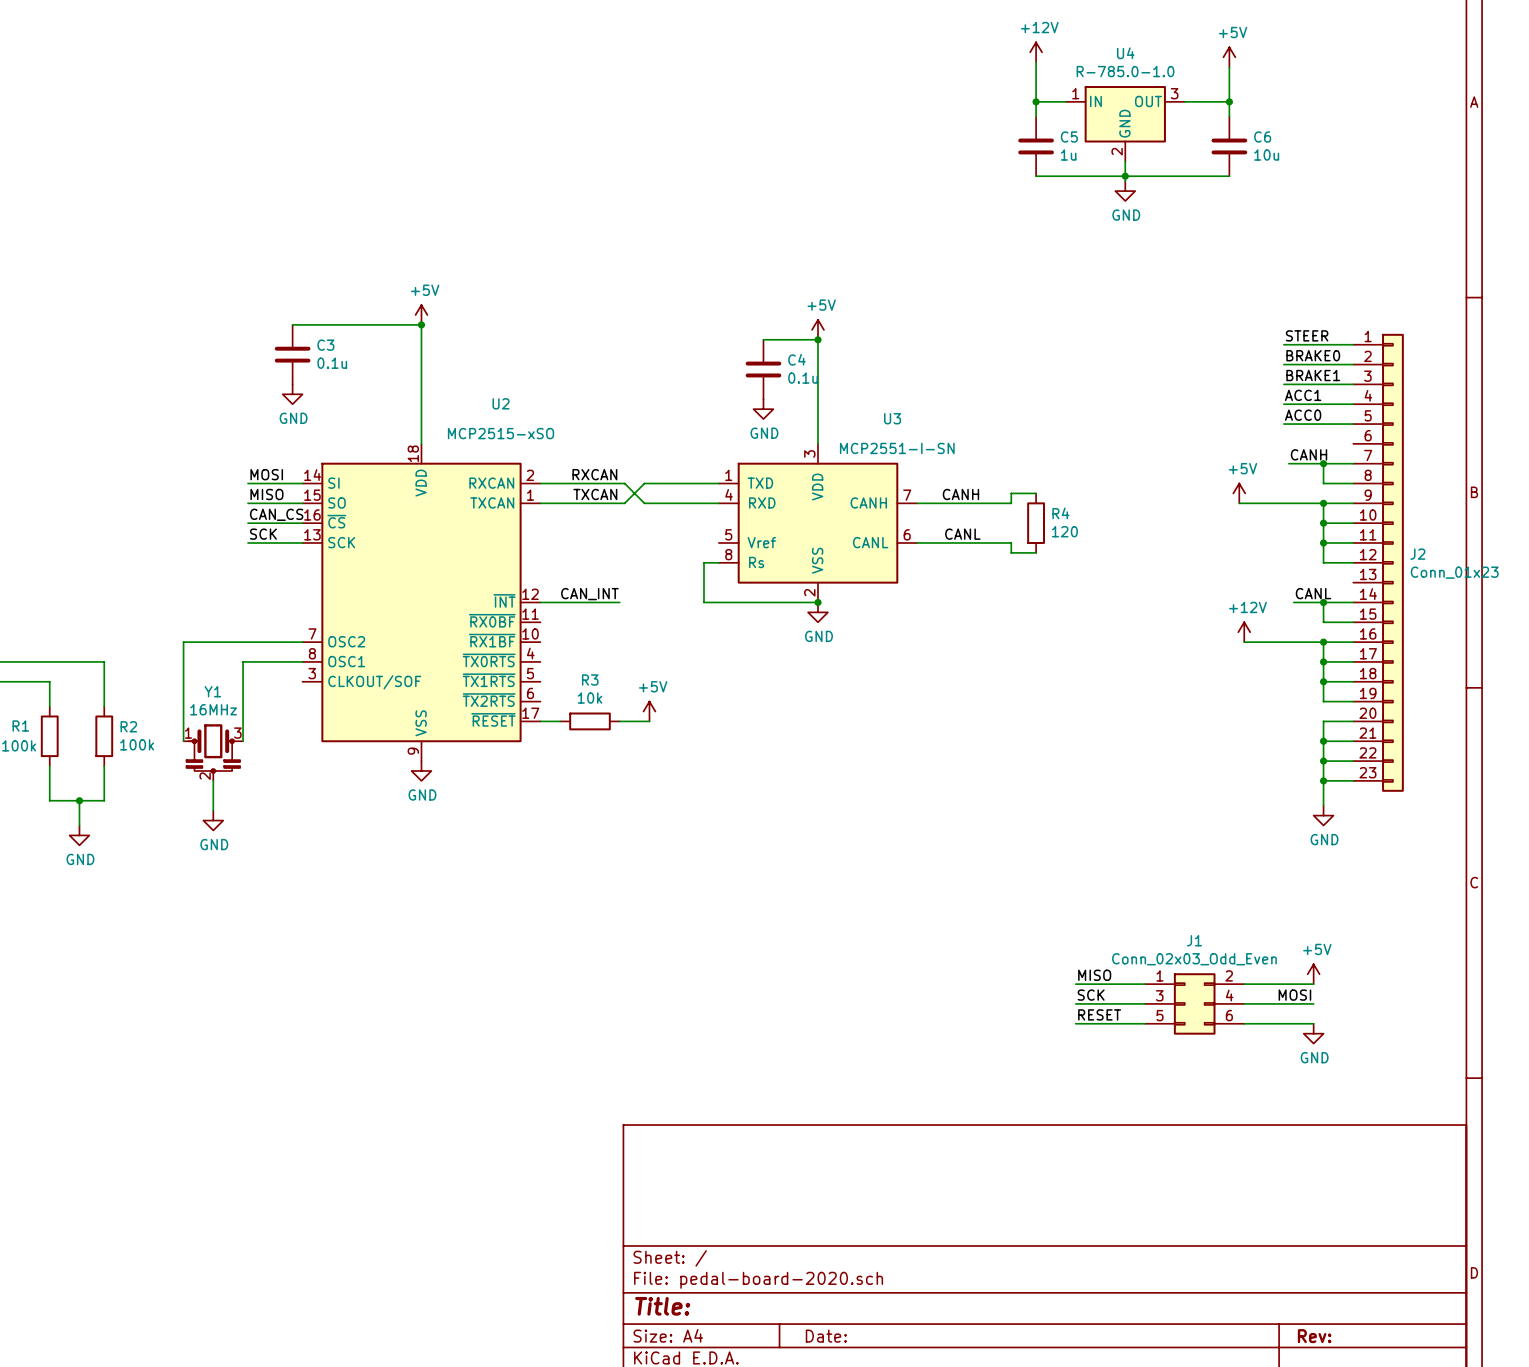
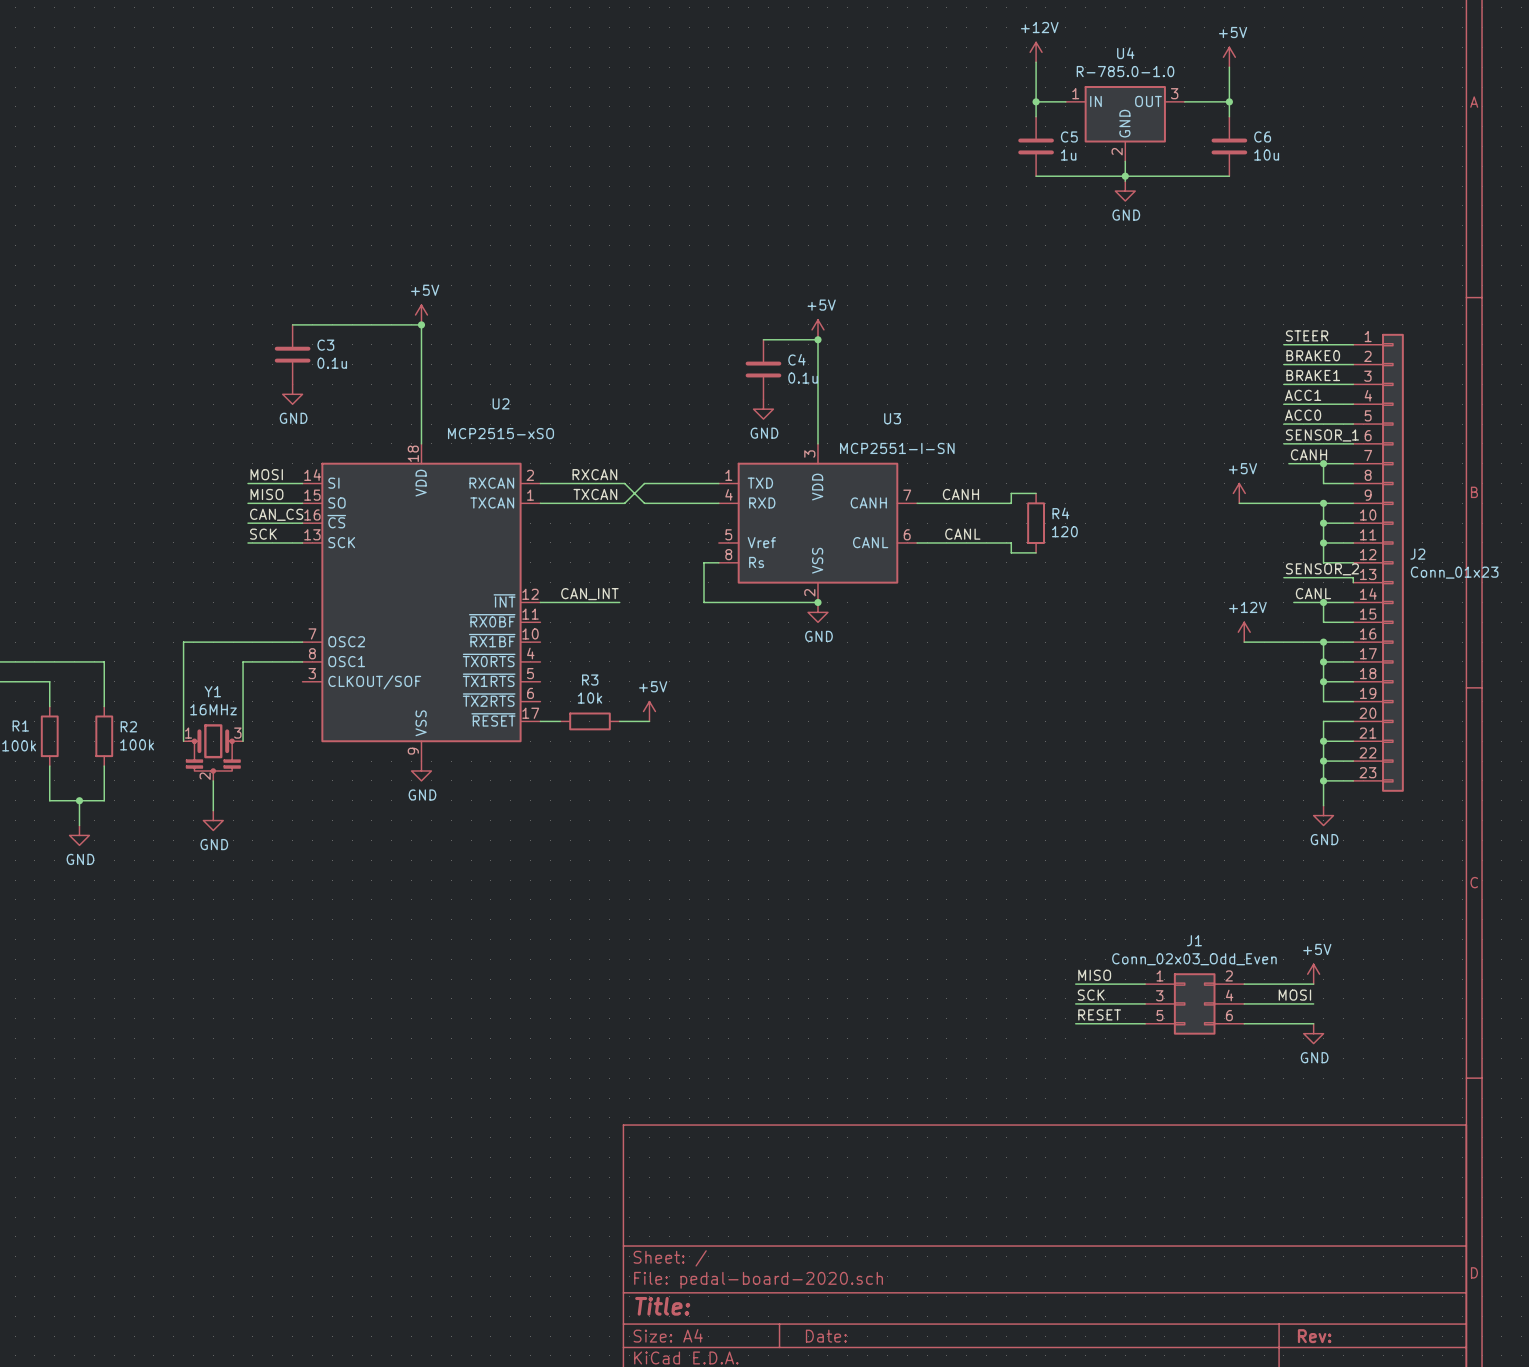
label: none -> SENSOR_1 (1322, 435)
wire: none -> (1283, 443) (1353, 443)
label: none -> SENSOR_2 (1322, 569)
wire: none -> (1283, 577) (1353, 577) (1353, 582)

